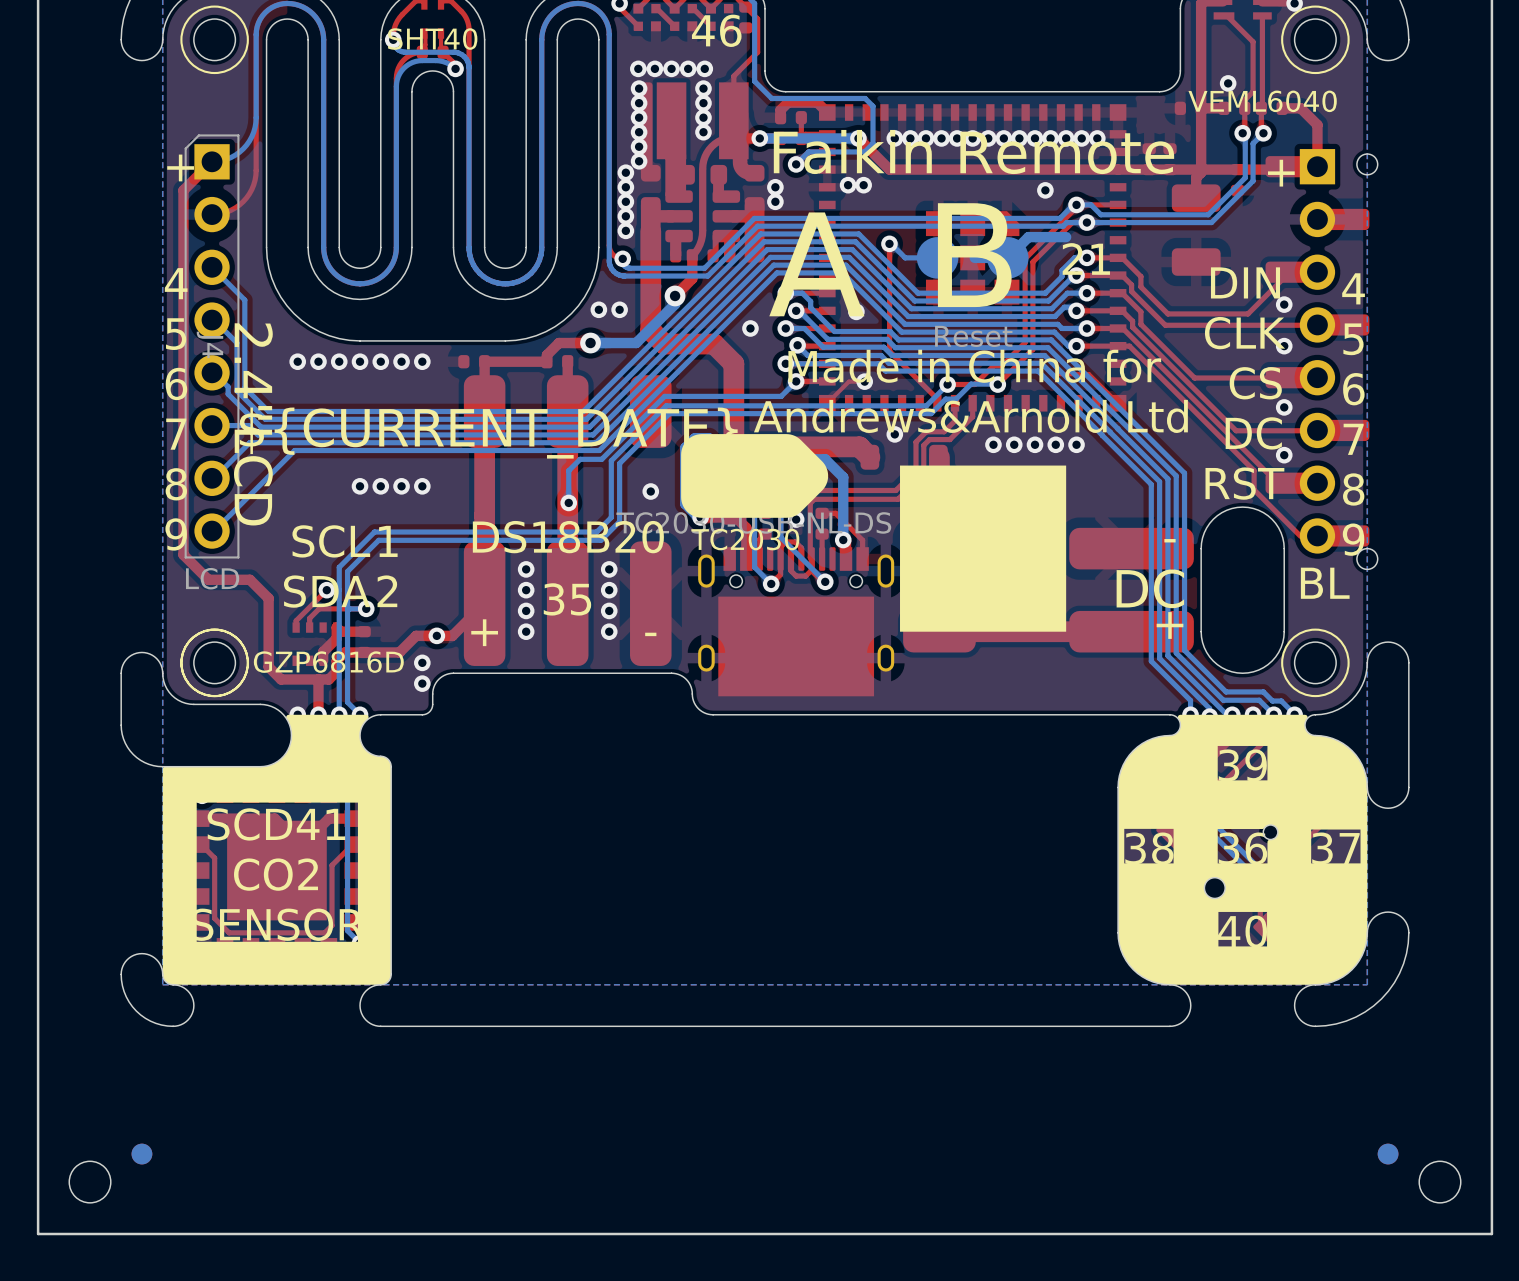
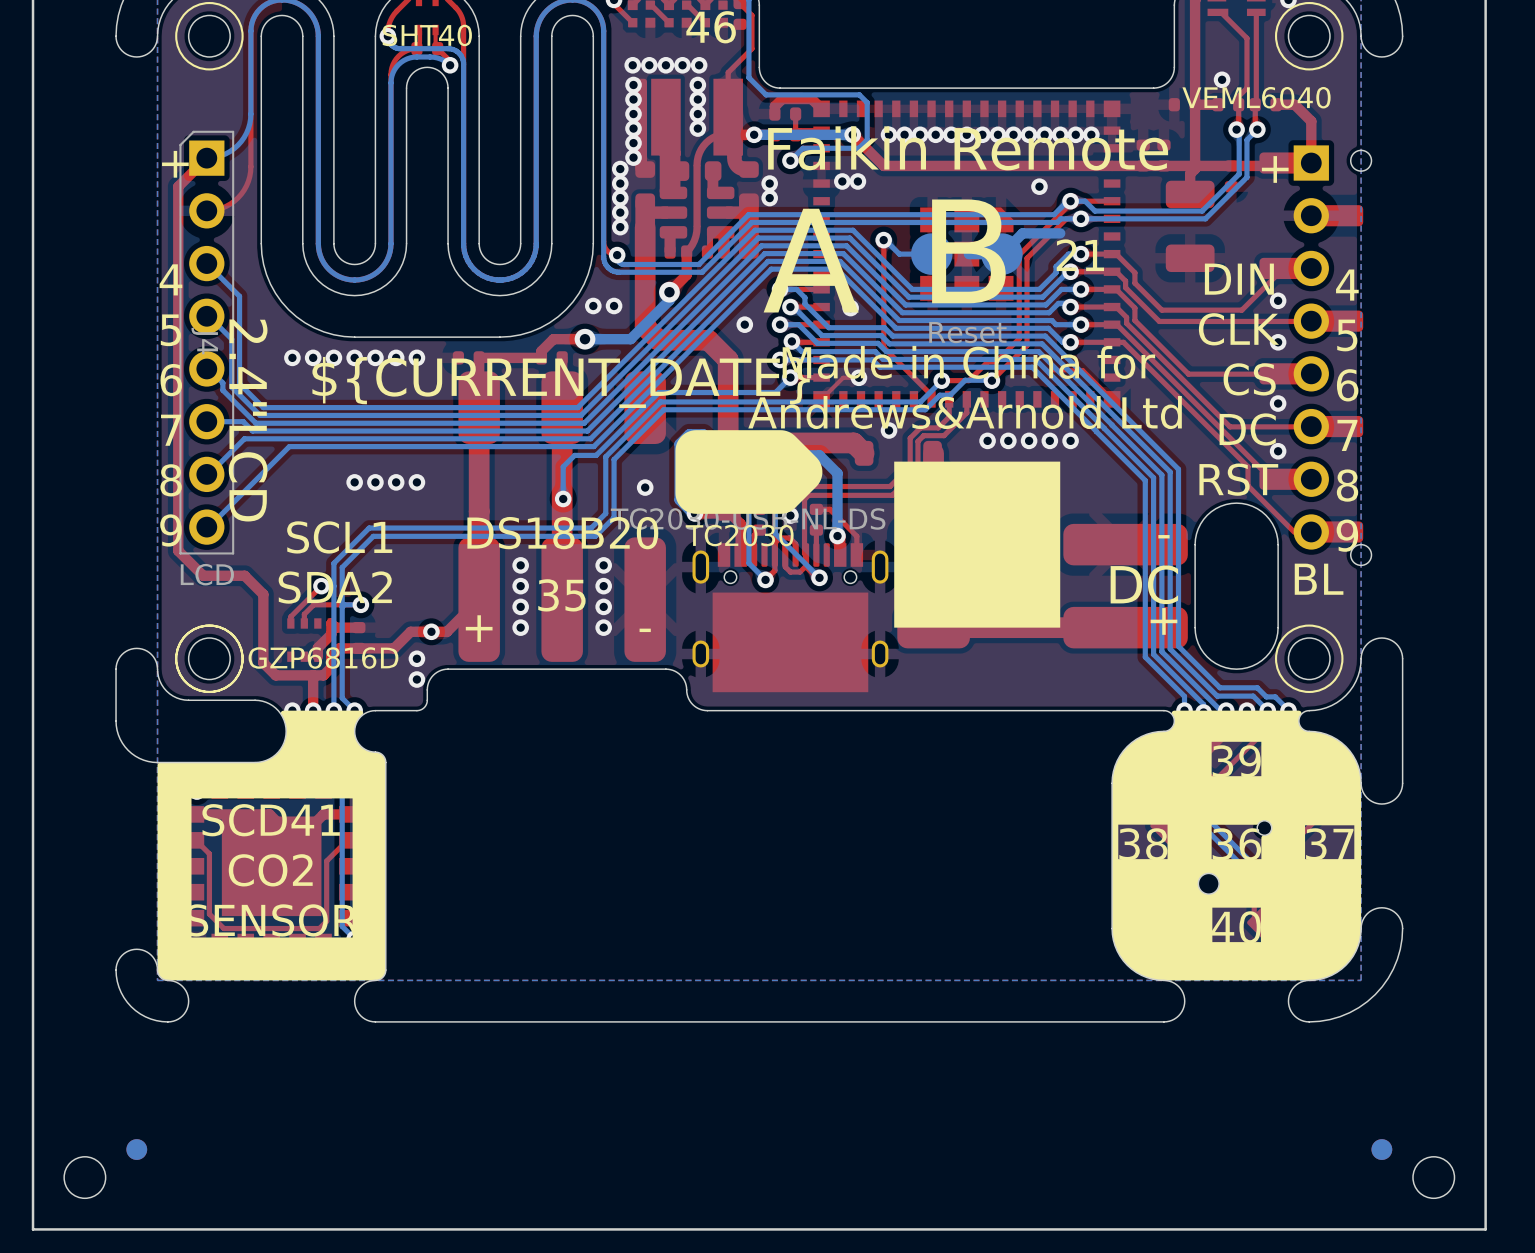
text position: ${CURRENT_DATE} (488, 433) -> ${CURRENT_DATE} (561, 382)

